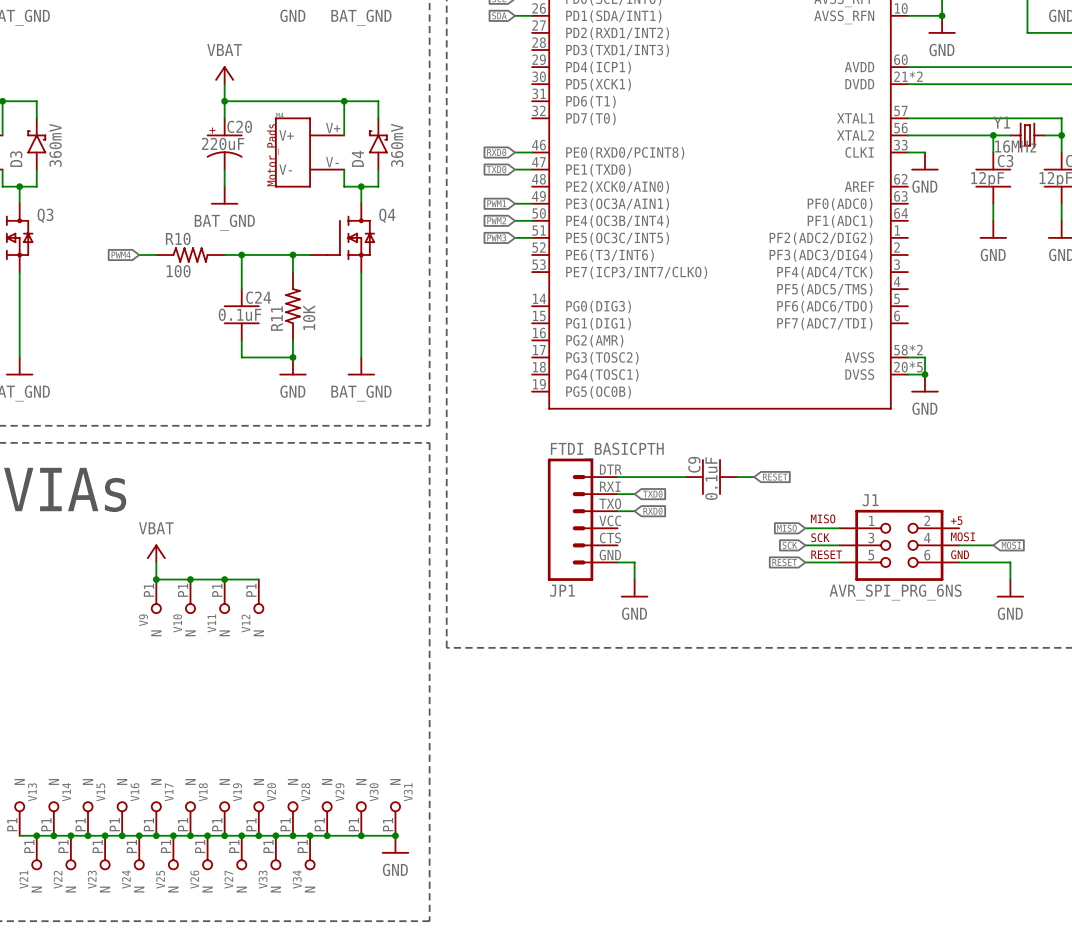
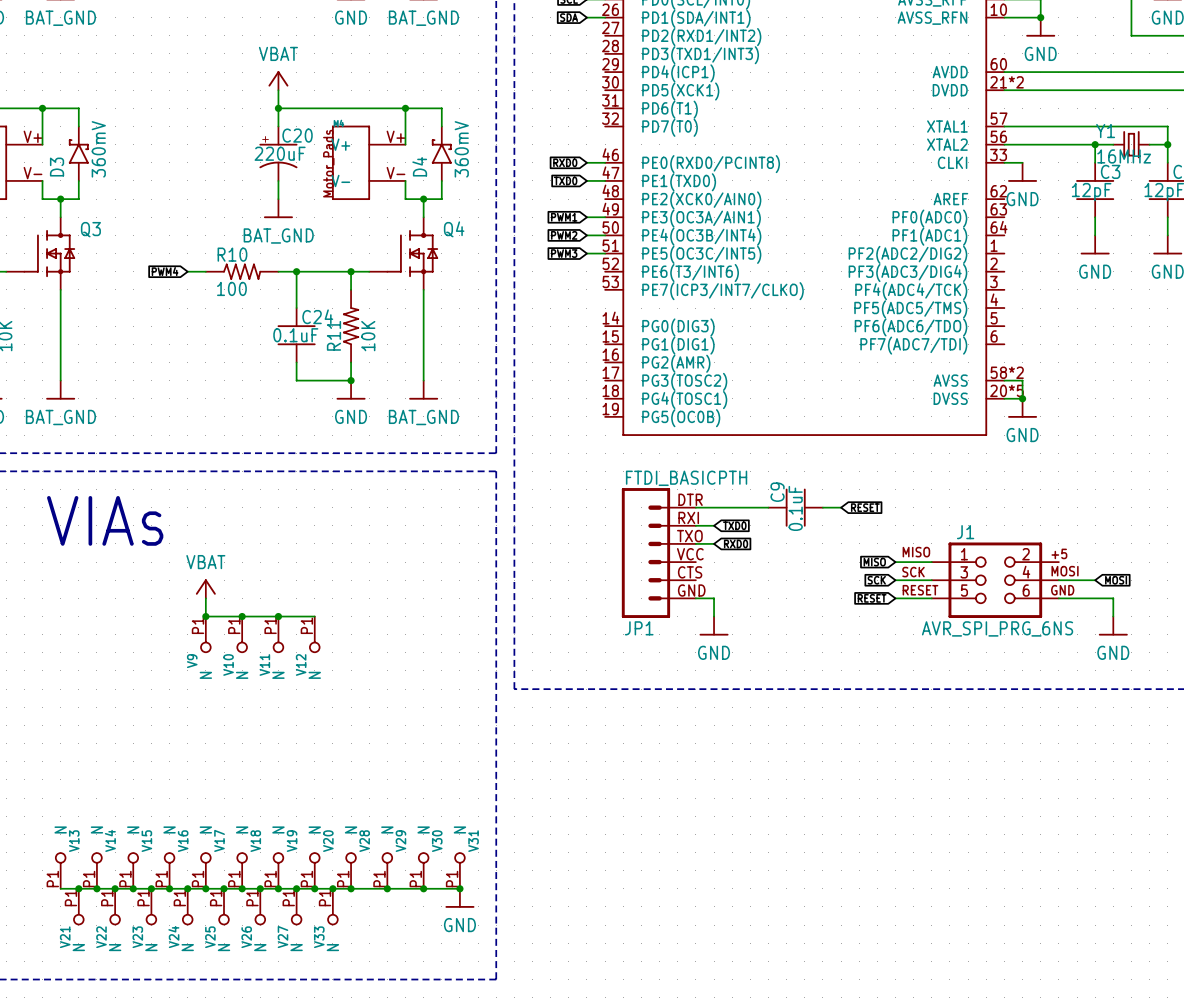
junction: (310, 835) -> none
V34: (310, 852) -> none

